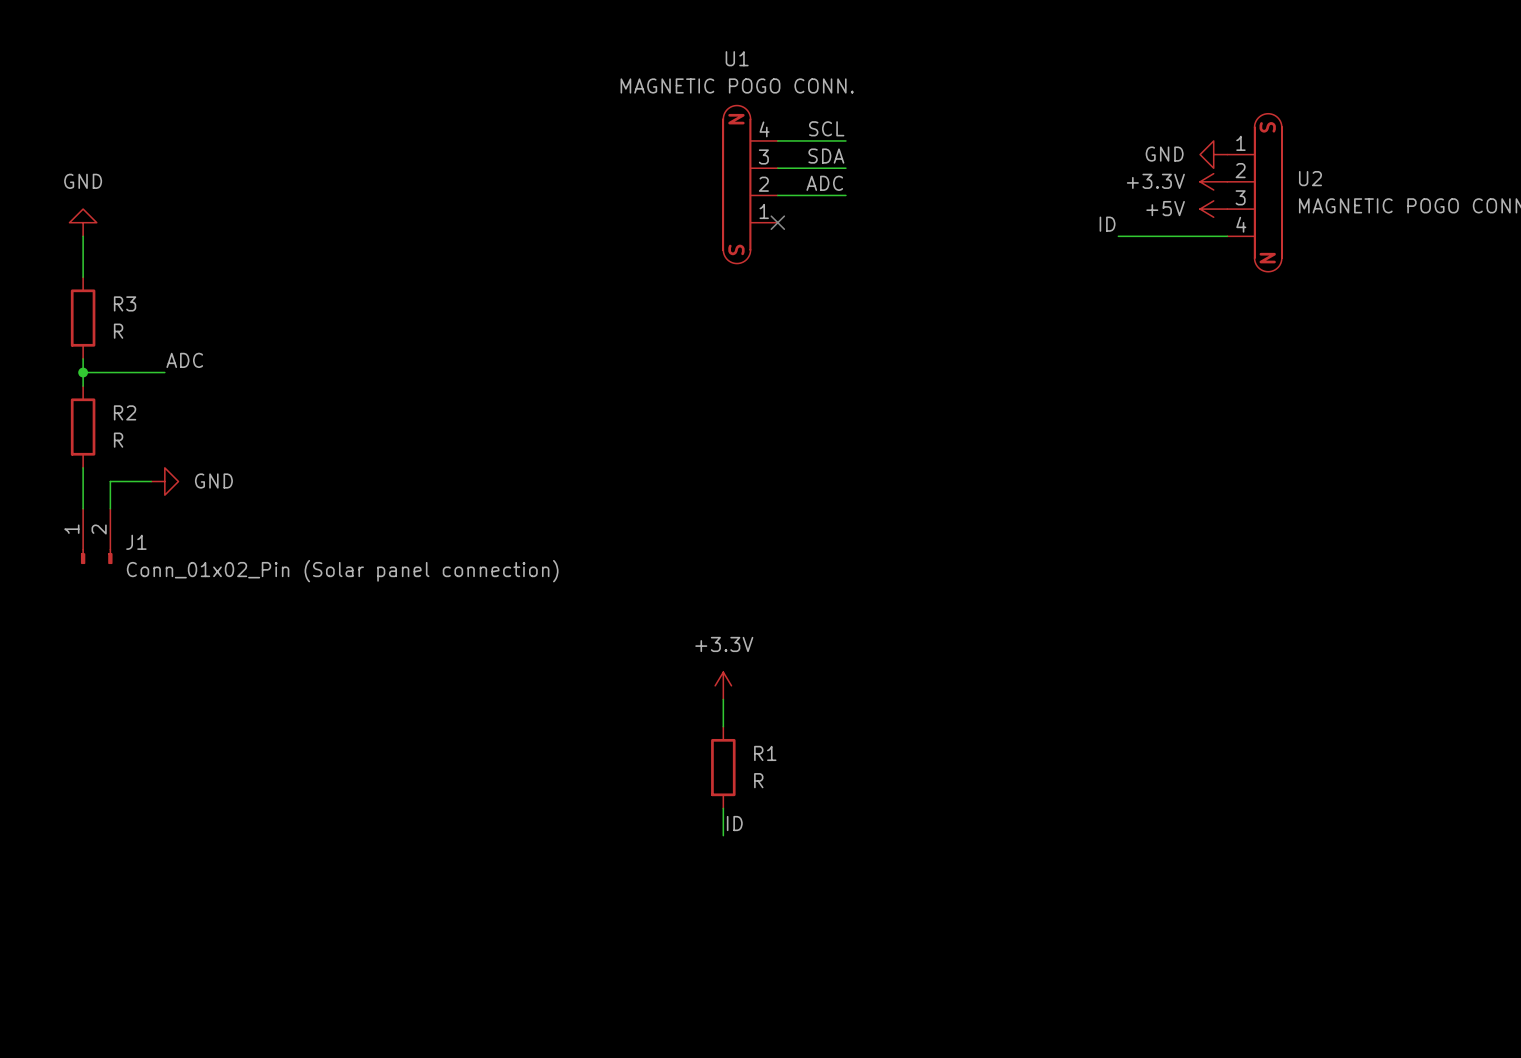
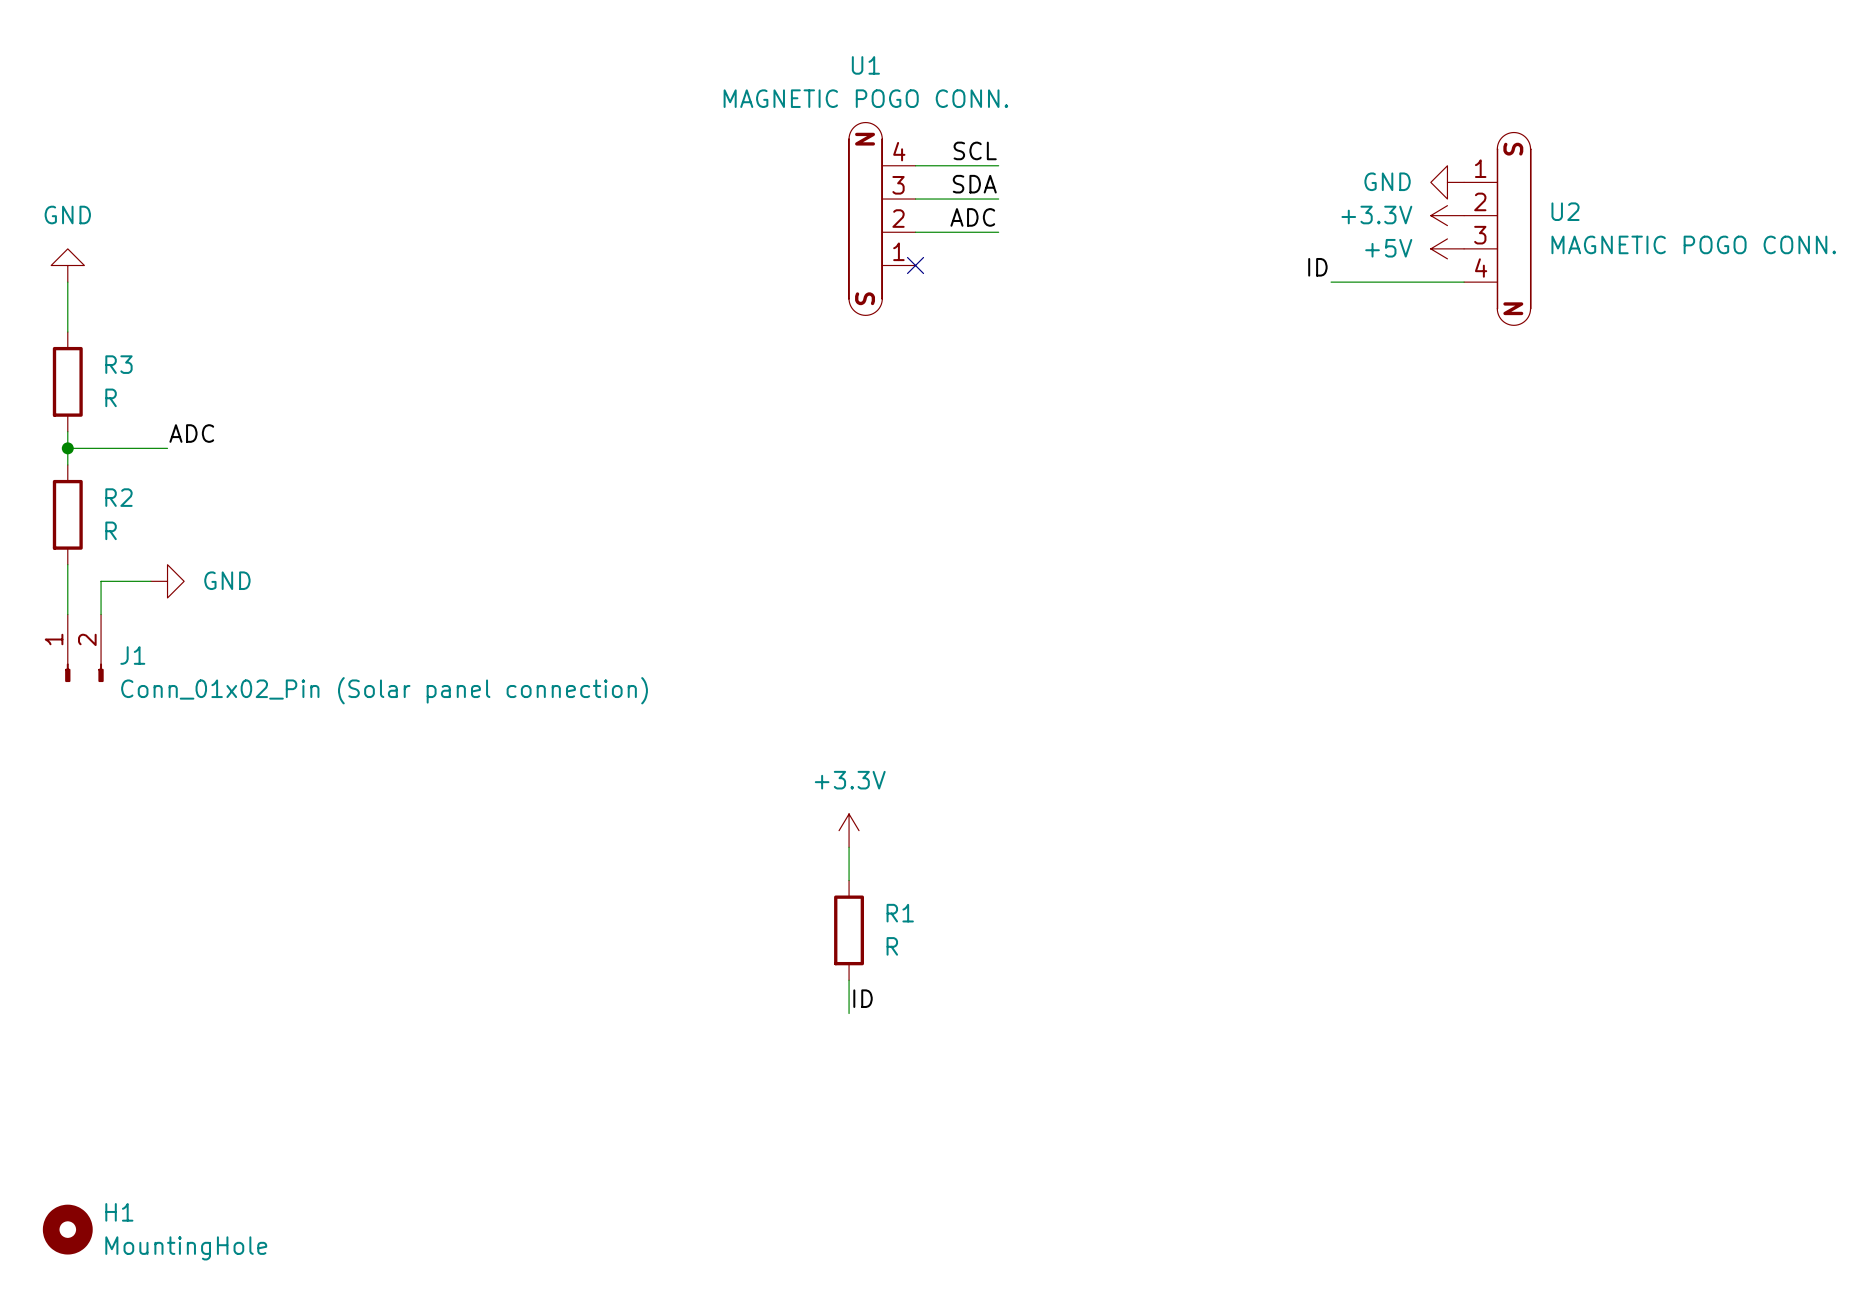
H1: none -> MountingHole (67, 1229)

